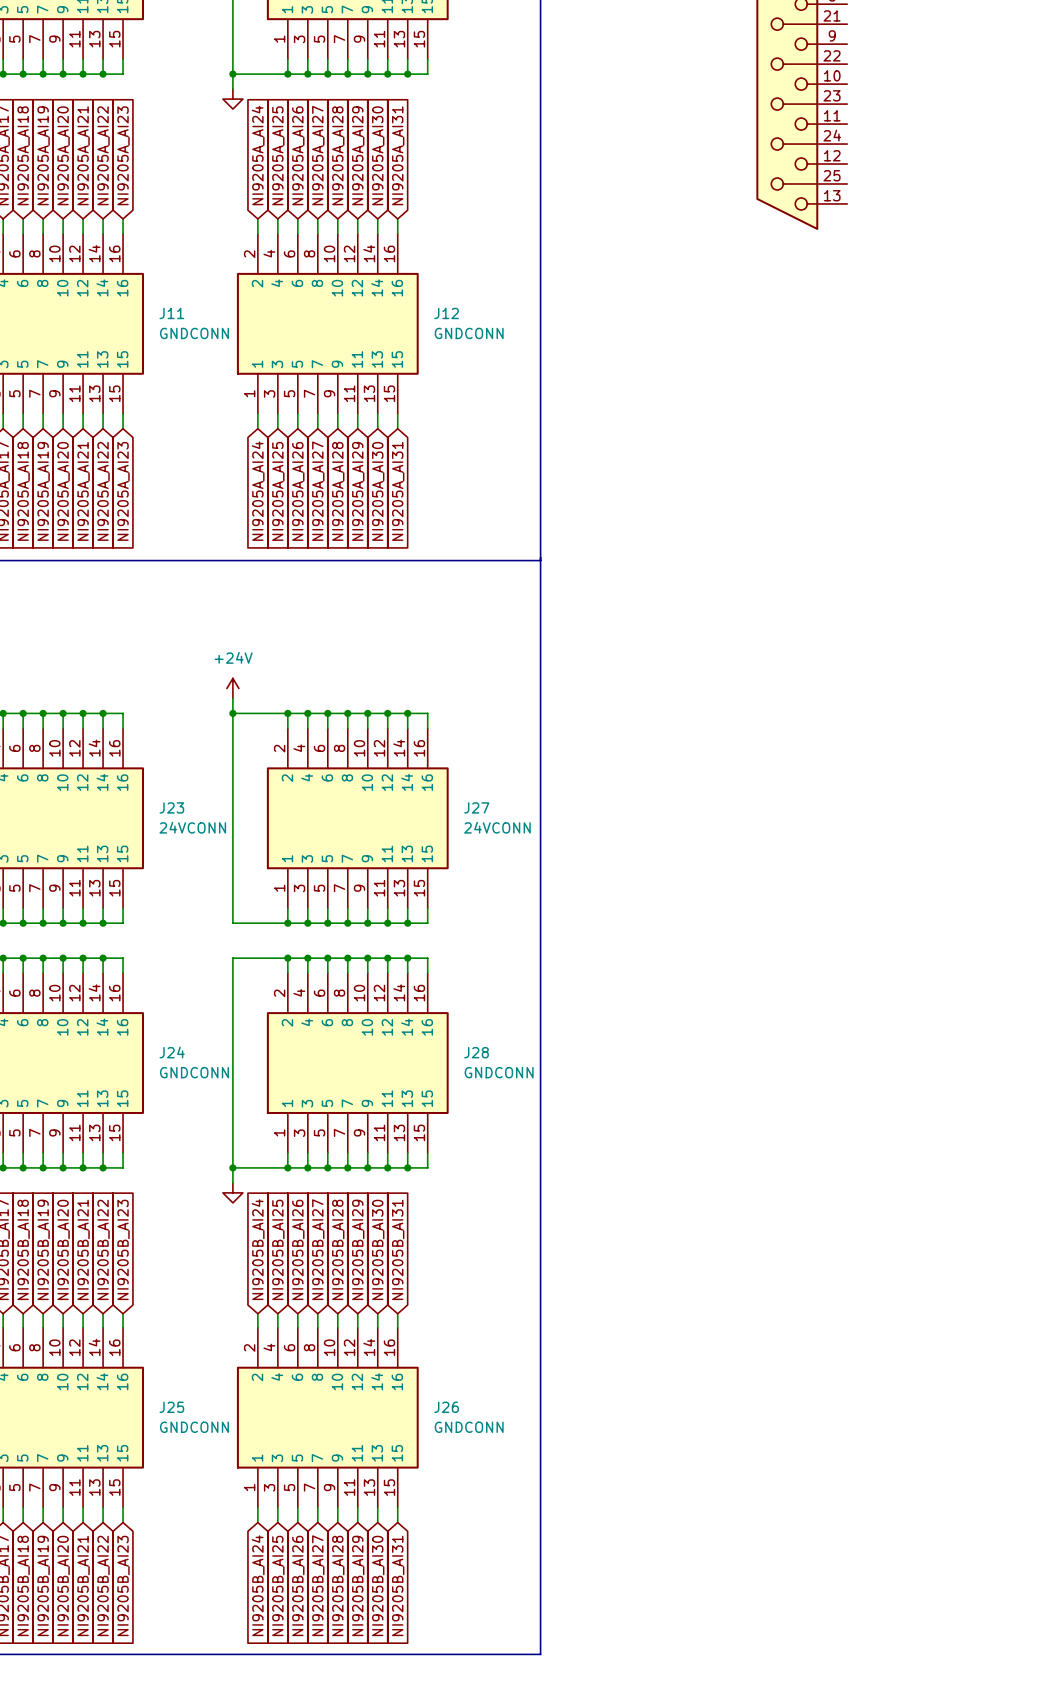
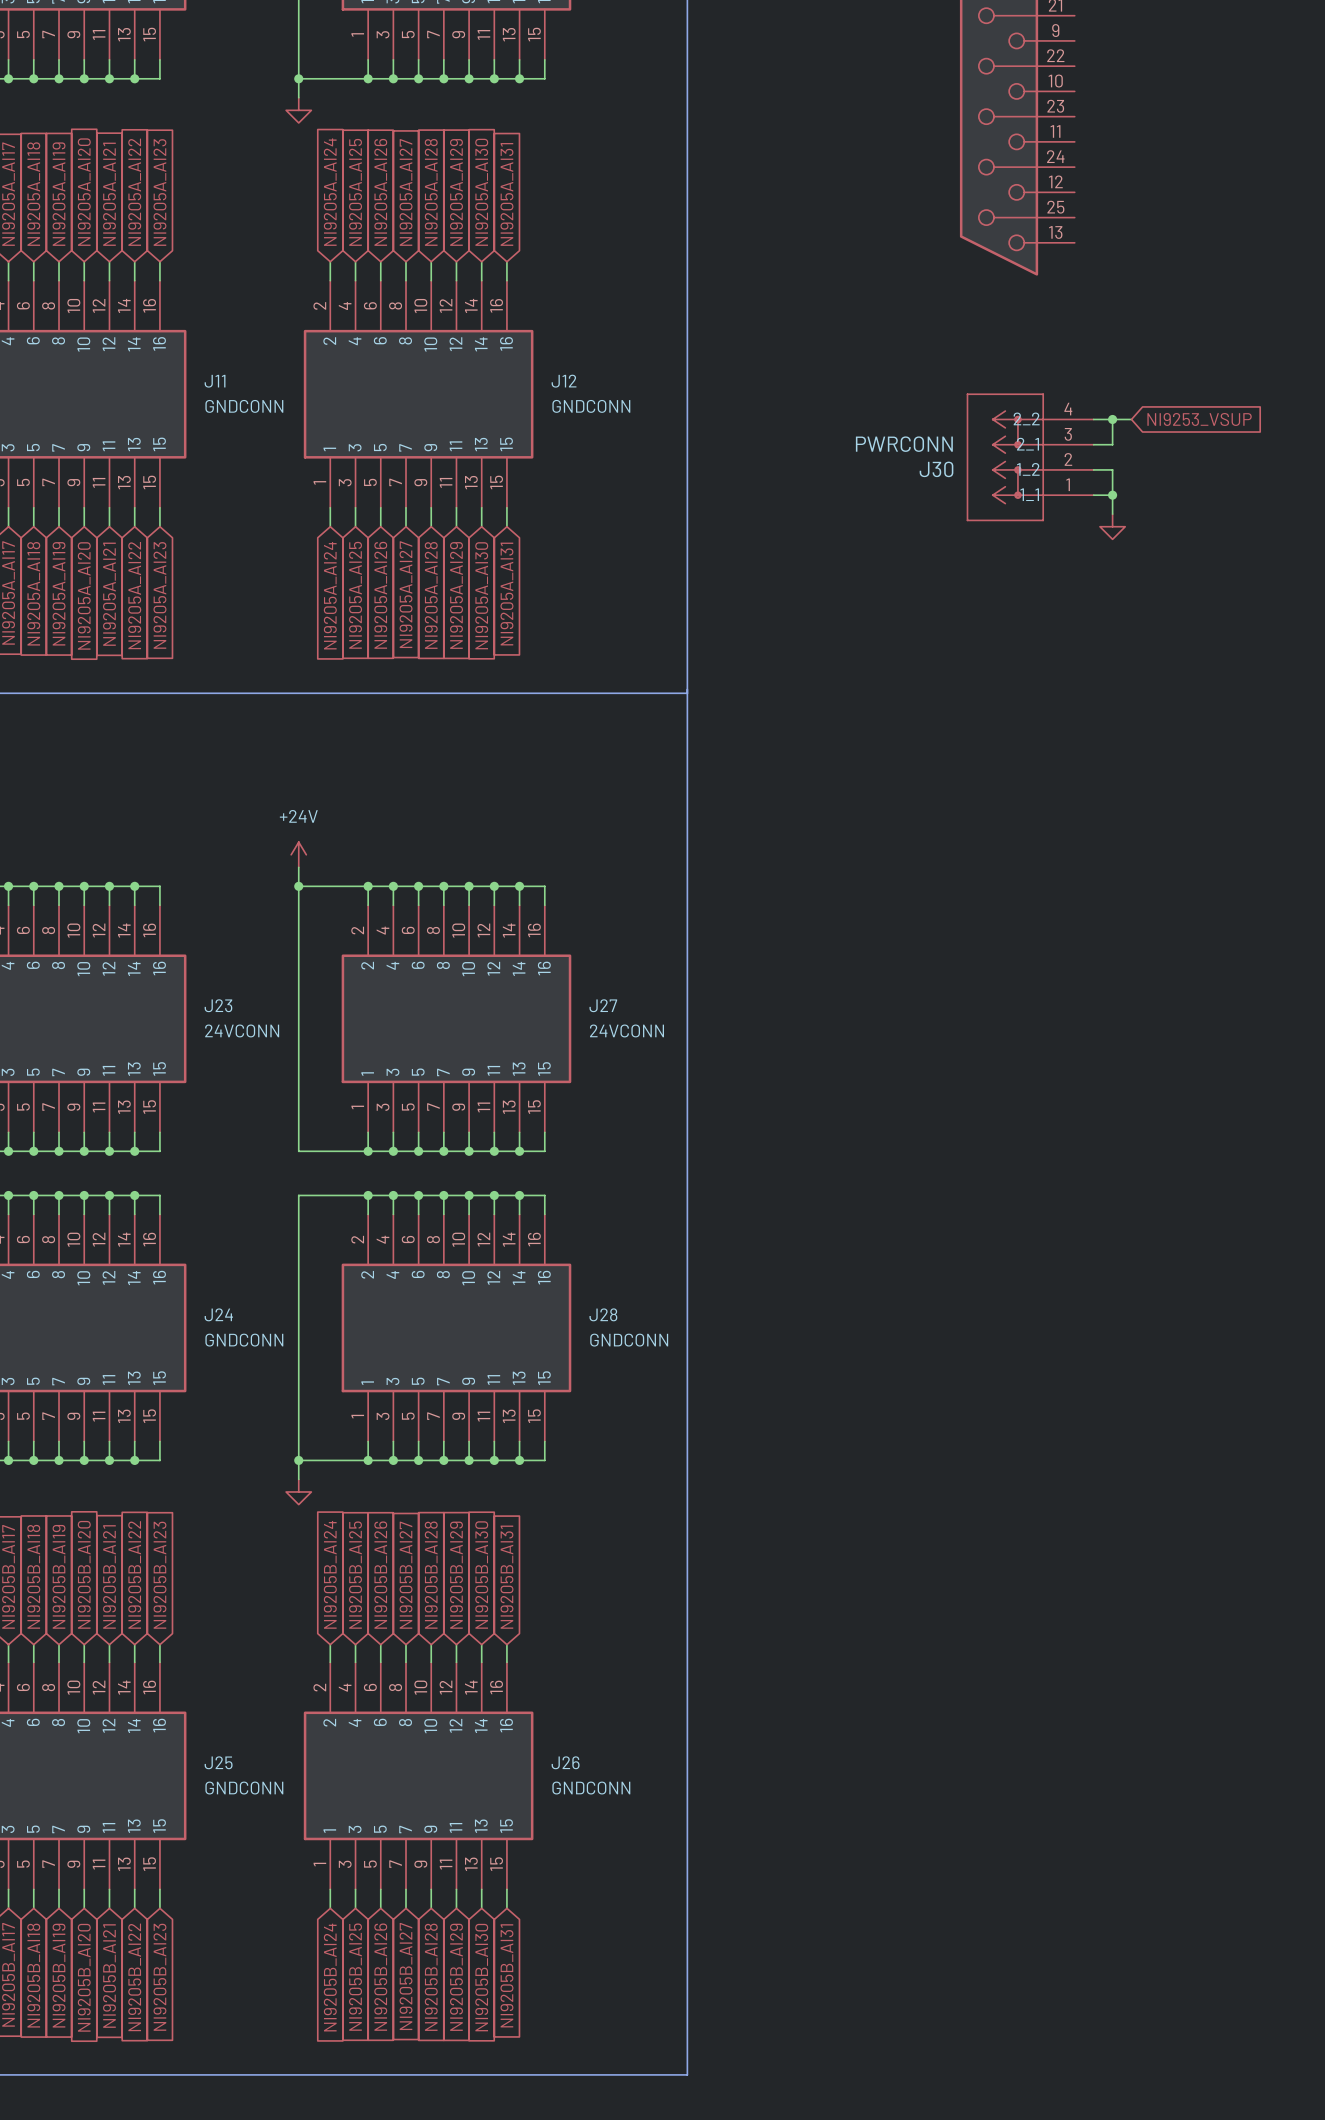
wire: none -> (1093, 419) (1131, 419)
wire: none -> (1112, 419) (1112, 444) (1093, 444)
junction: none -> (1112, 419)
global label: none -> NI9253_VSUP (1199, 419)
J30: none -> PWRCONN (1030, 457)
wire: none -> (1093, 469) (1112, 469) (1112, 514)
wire: none -> (1093, 495) (1112, 495)
junction: none -> (1112, 495)
power symbol: none -> (1112, 526)

